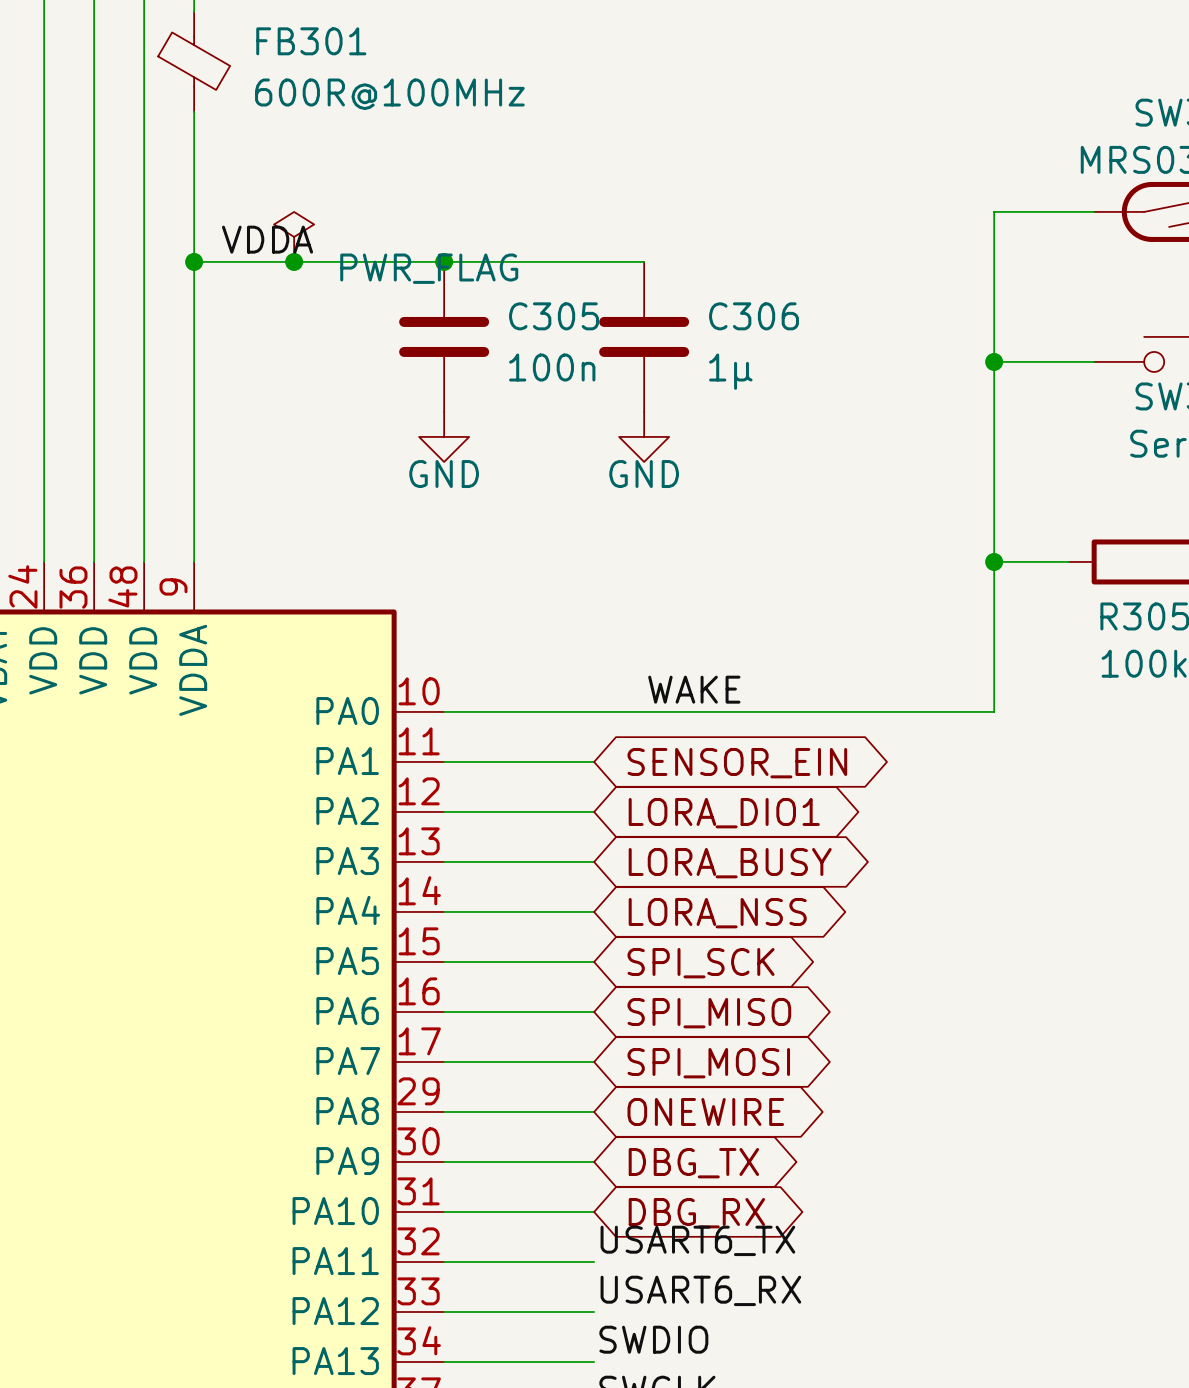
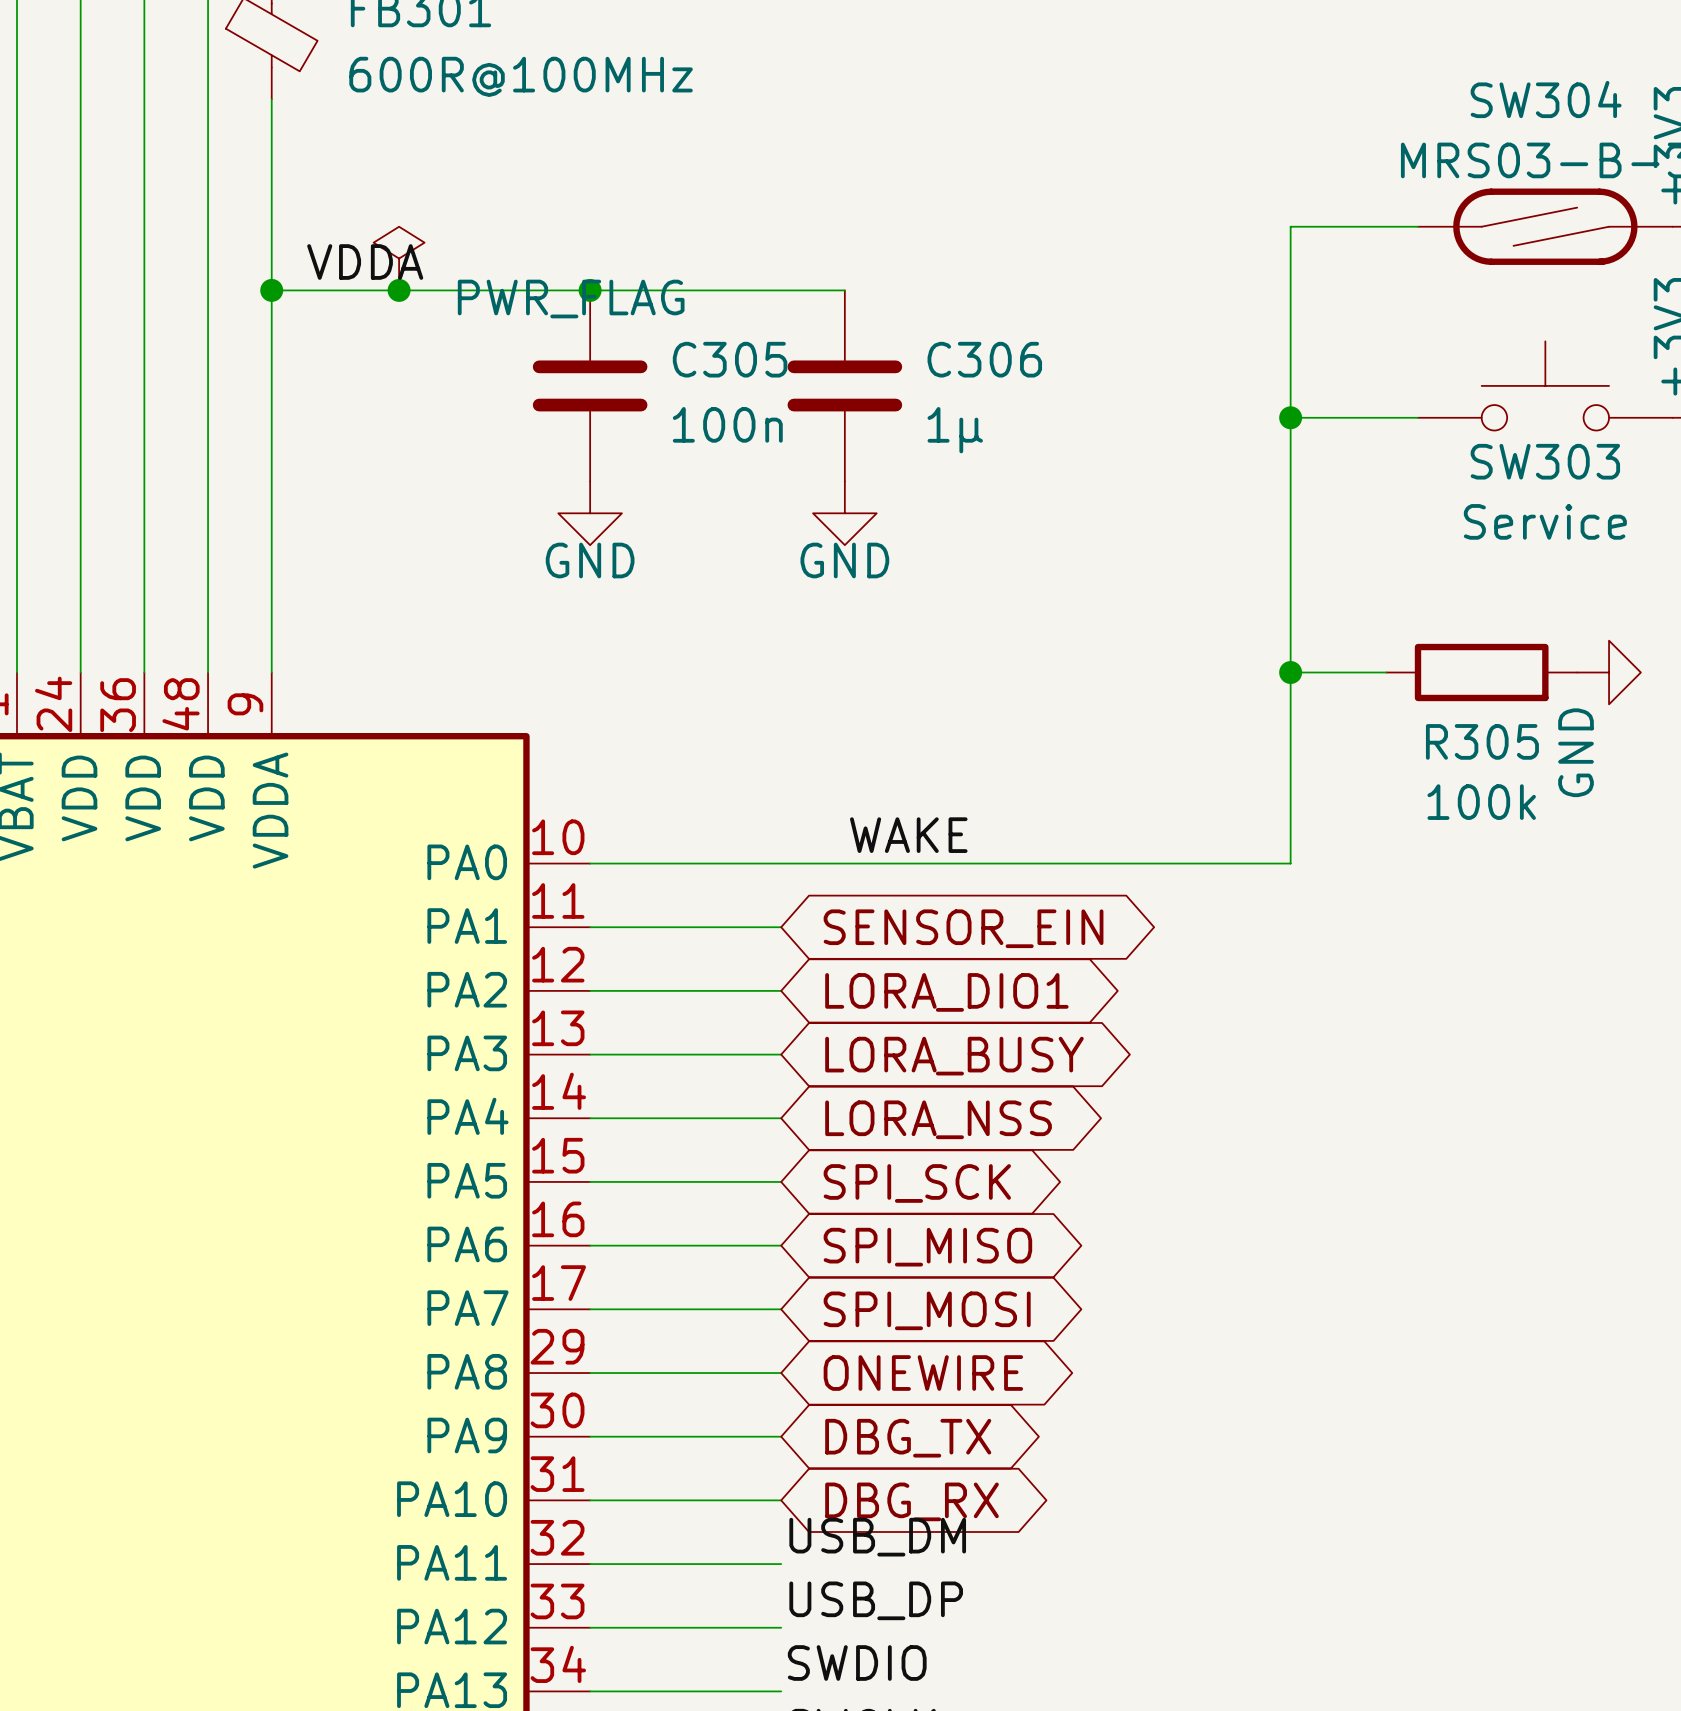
label: USART6_TX (697, 1240) -> USB_DM (877, 1537)
label: USART6_RX (700, 1290) -> USB_DP (876, 1600)

